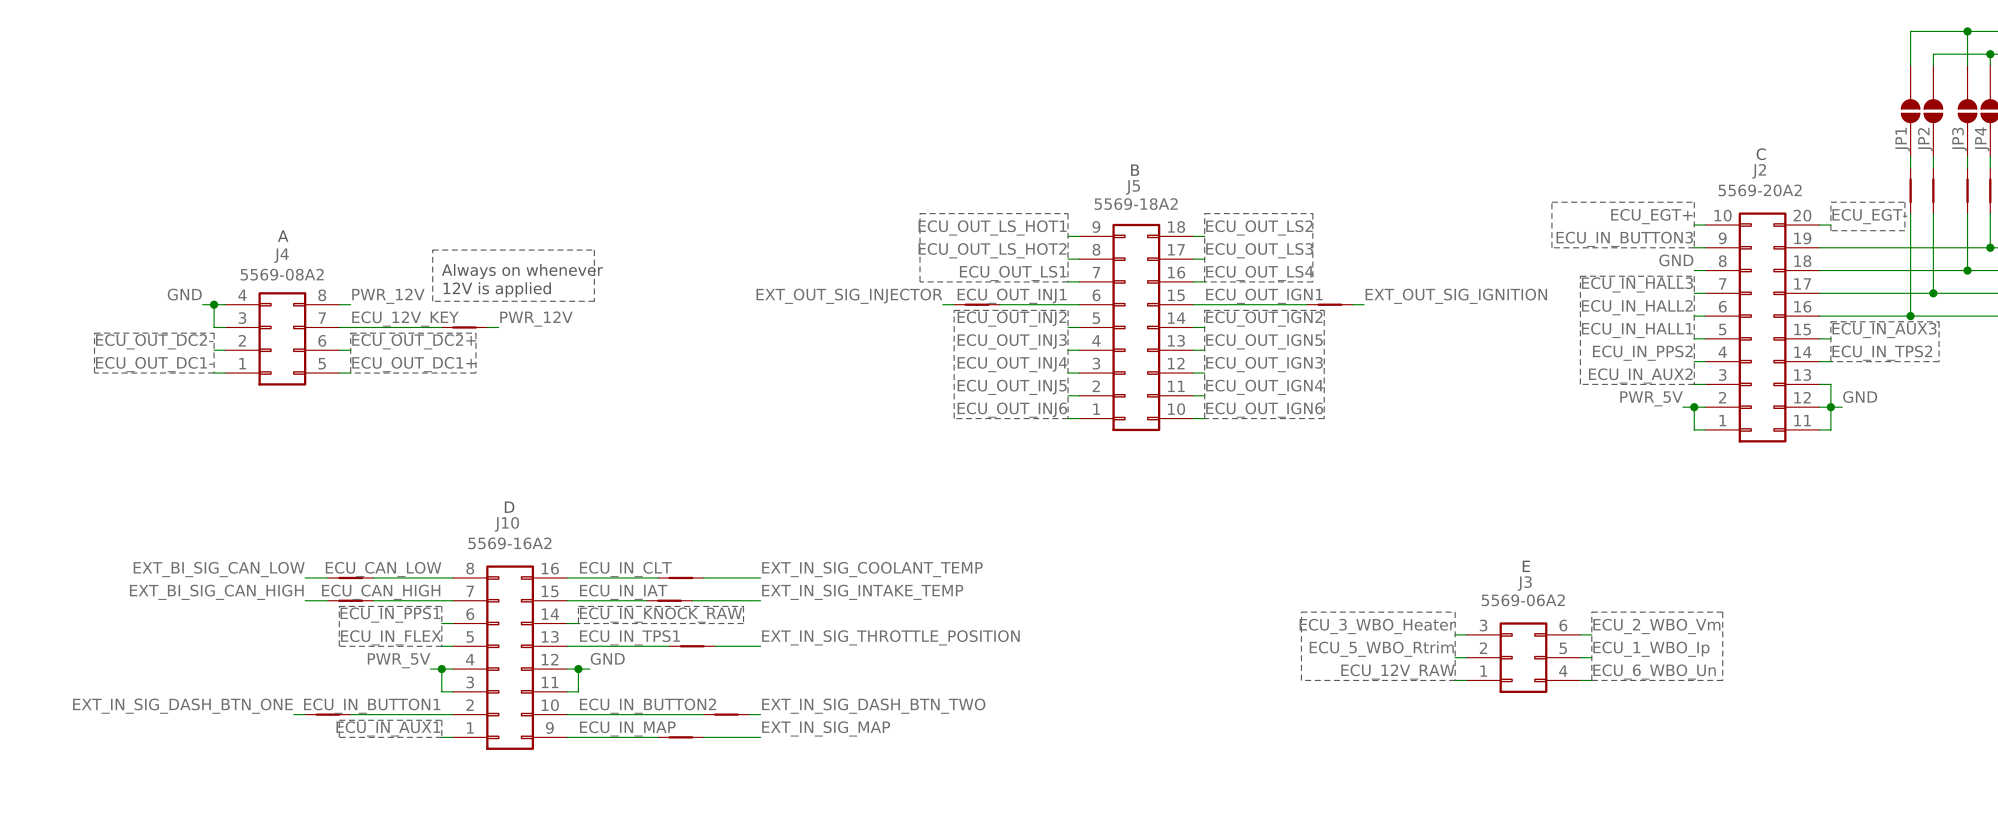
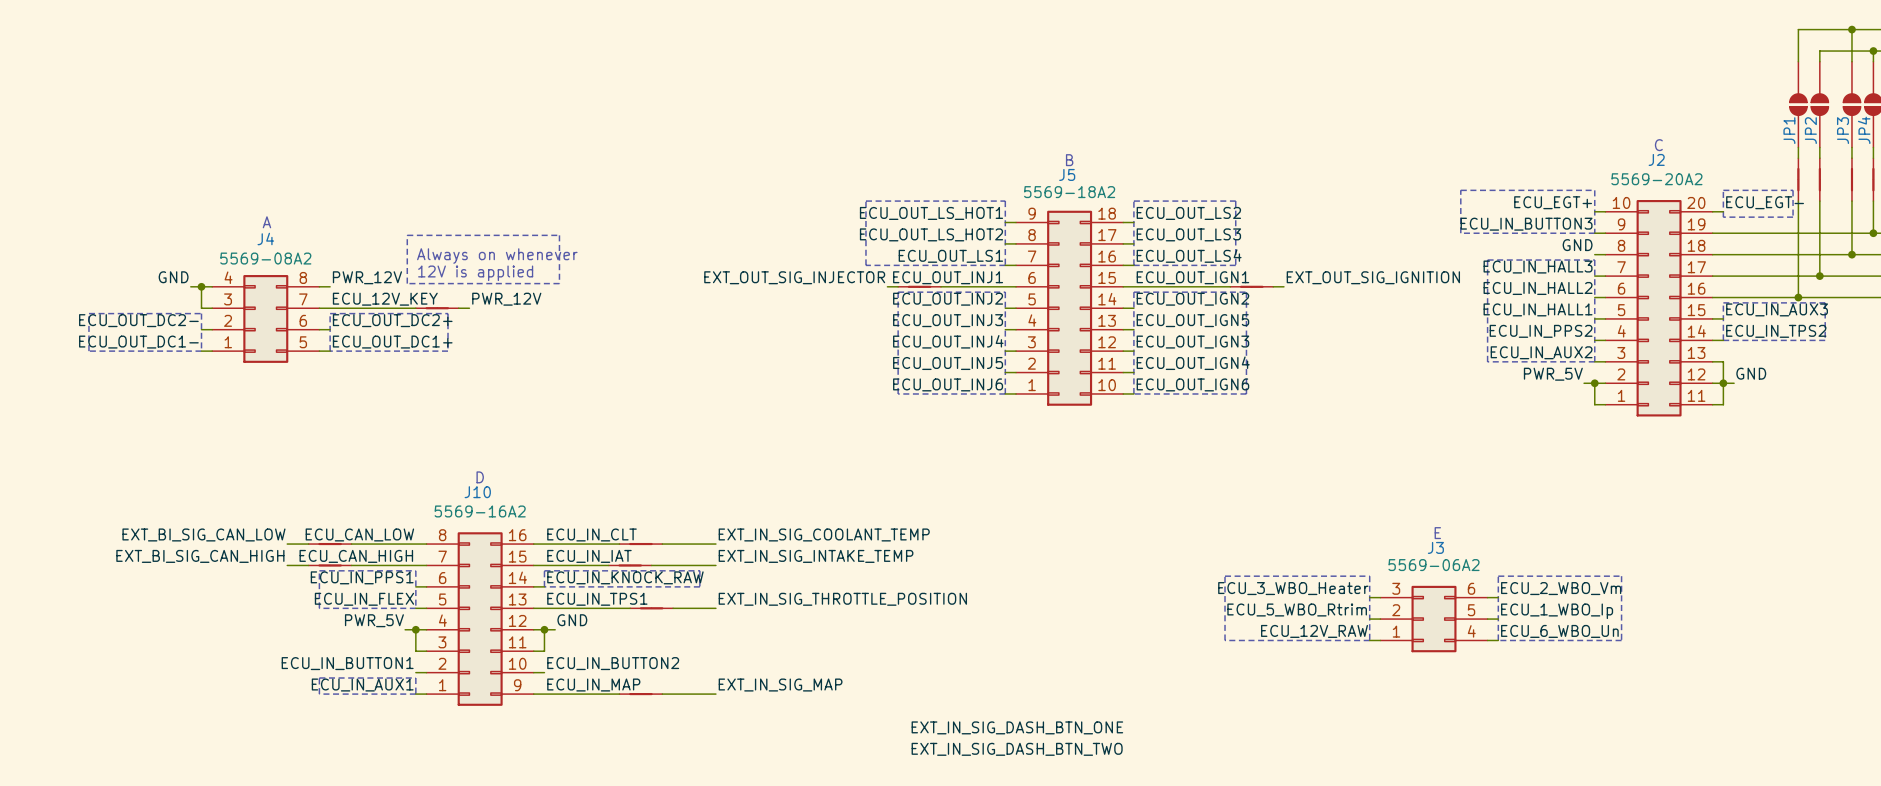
label: EXT_IN_SIG_DASH_BTN_ONE (182, 706) -> none
label: EXT_IN_SIG_DASH_BTN_TWO (873, 706) -> none
wire: (293, 714) (305, 714) -> none
part: (327, 714) -> none
wire: (350, 714) (441, 714) -> none
wire: (578, 714) (703, 714) -> none
part: (726, 714) -> none
wire: (749, 714) (760, 714) -> none
label: none -> EXT_IN_SIG_DASH_BTN_ONE (1017, 727)
label: none -> EXT_IN_SIG_DASH_BTN_TWO (1017, 749)

